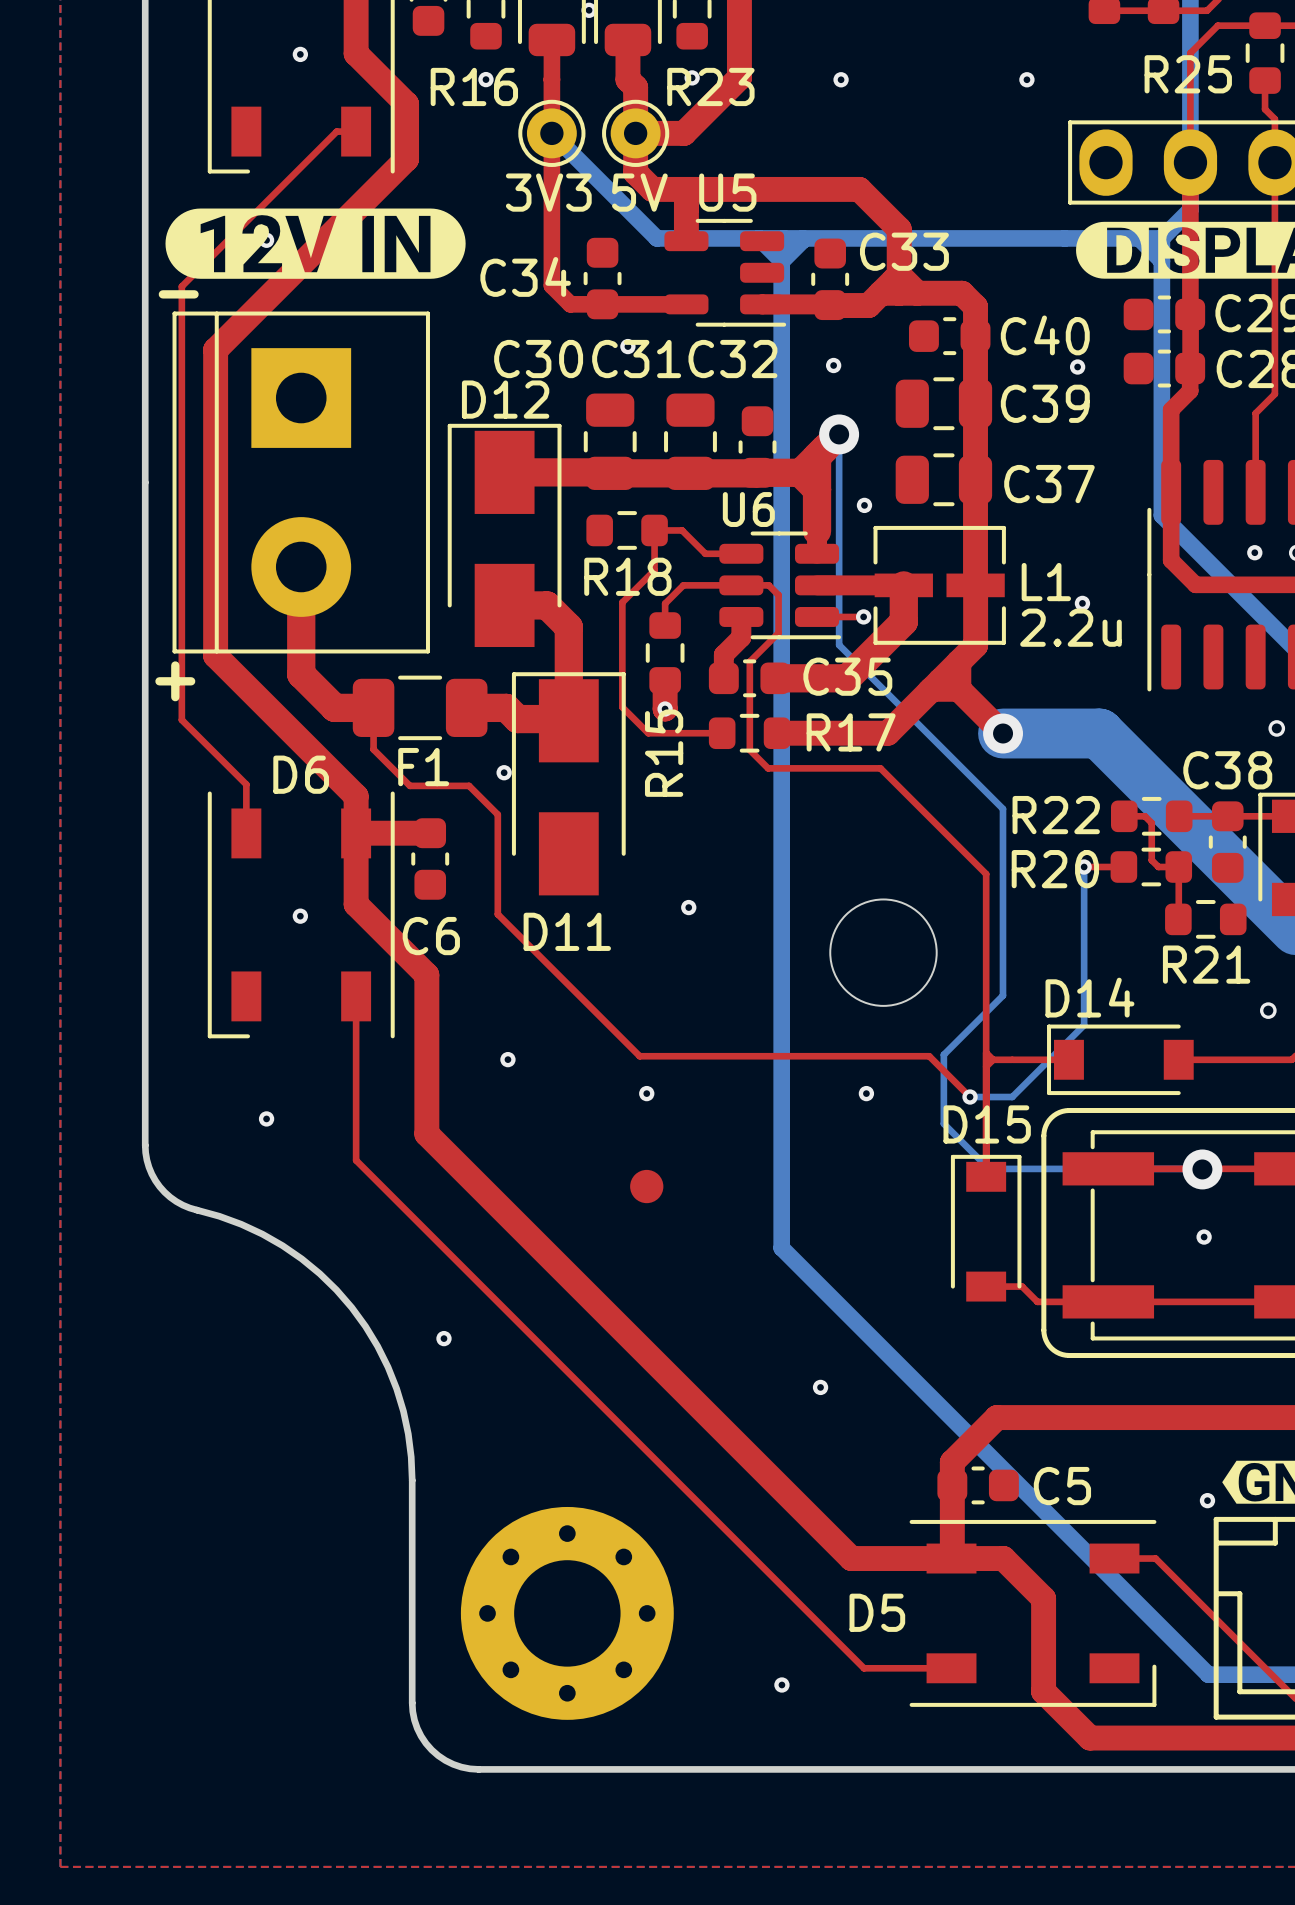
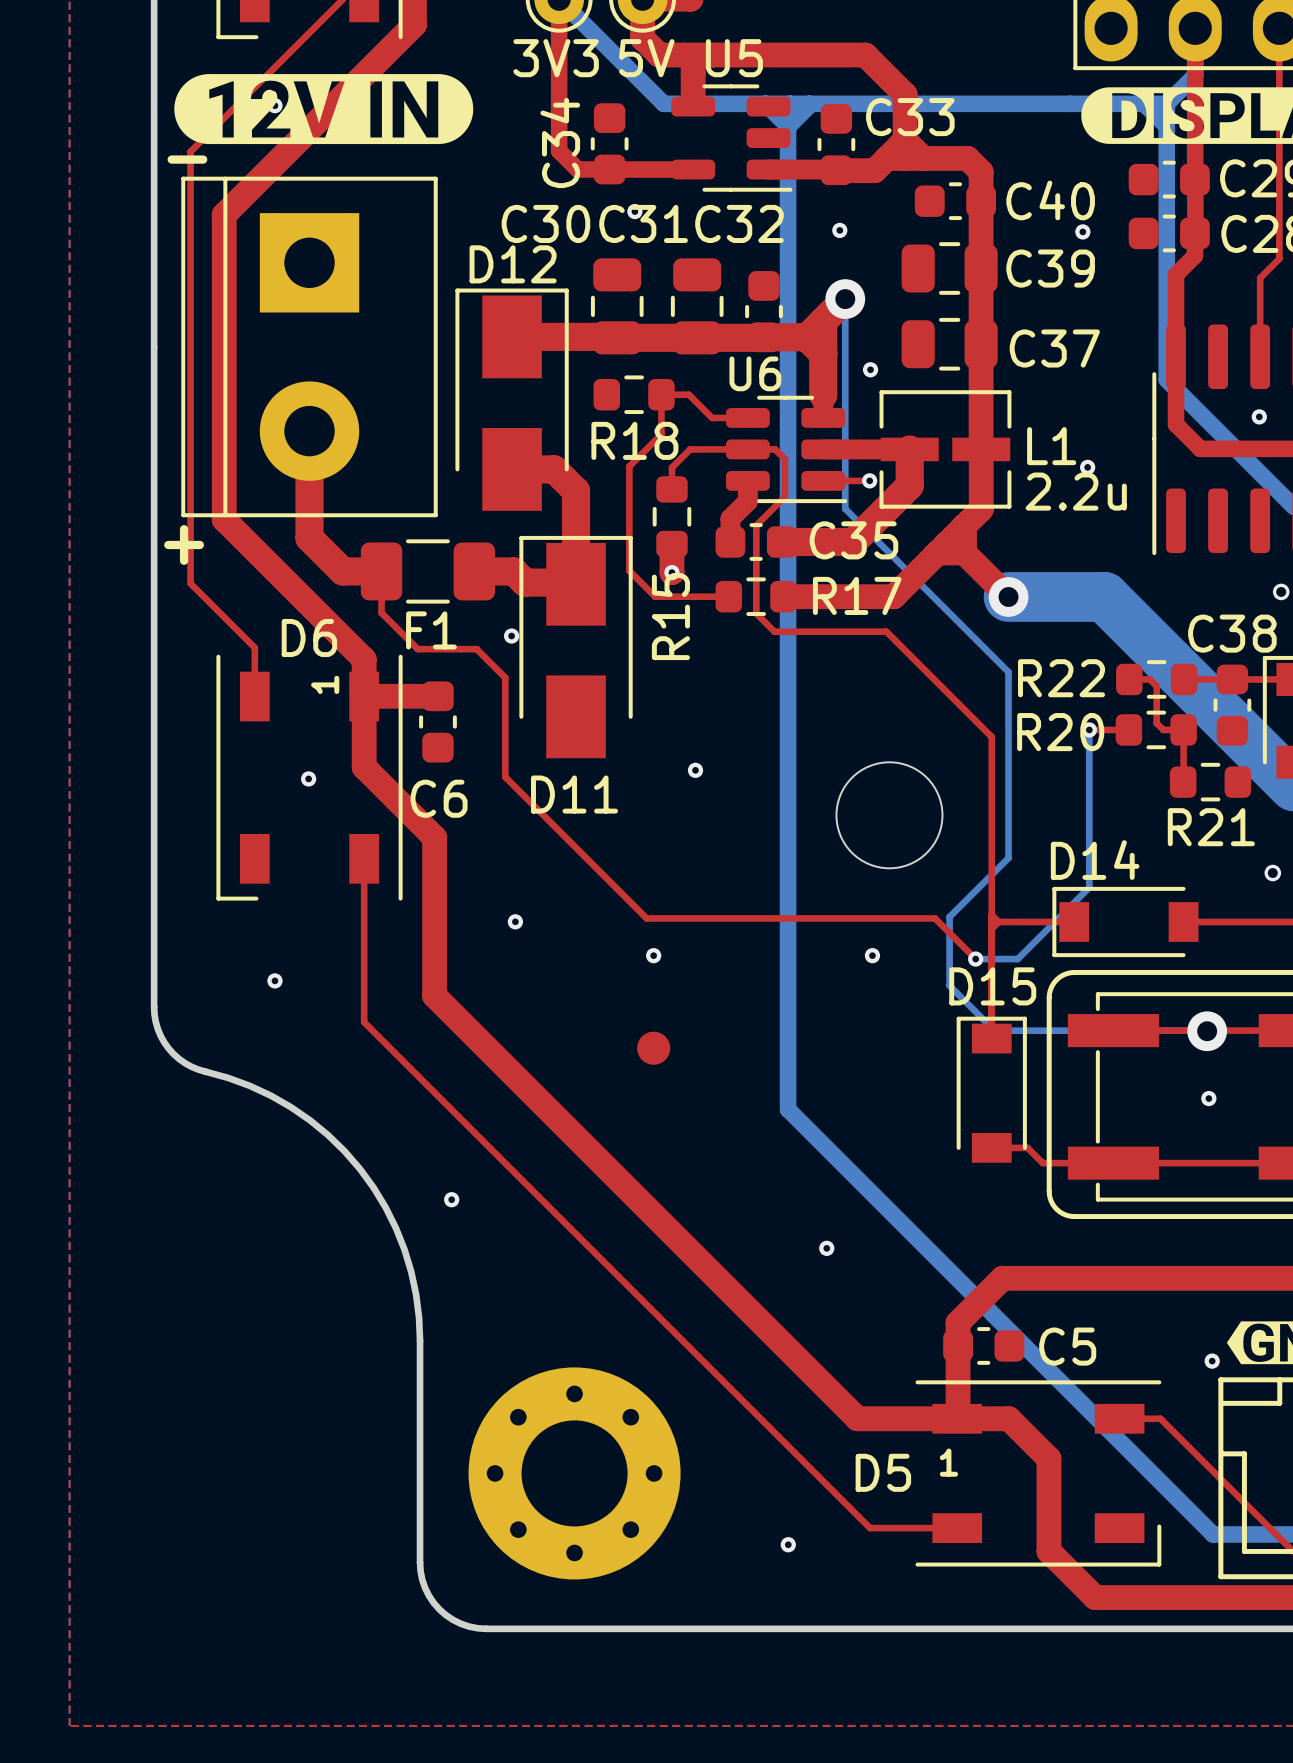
C34 name rotation: 0° (525, 276) -> 90° counterclockwise (560, 143)
D6 text: none -> 1 (325, 684)
D5 text: none -> 1 (948, 1462)

